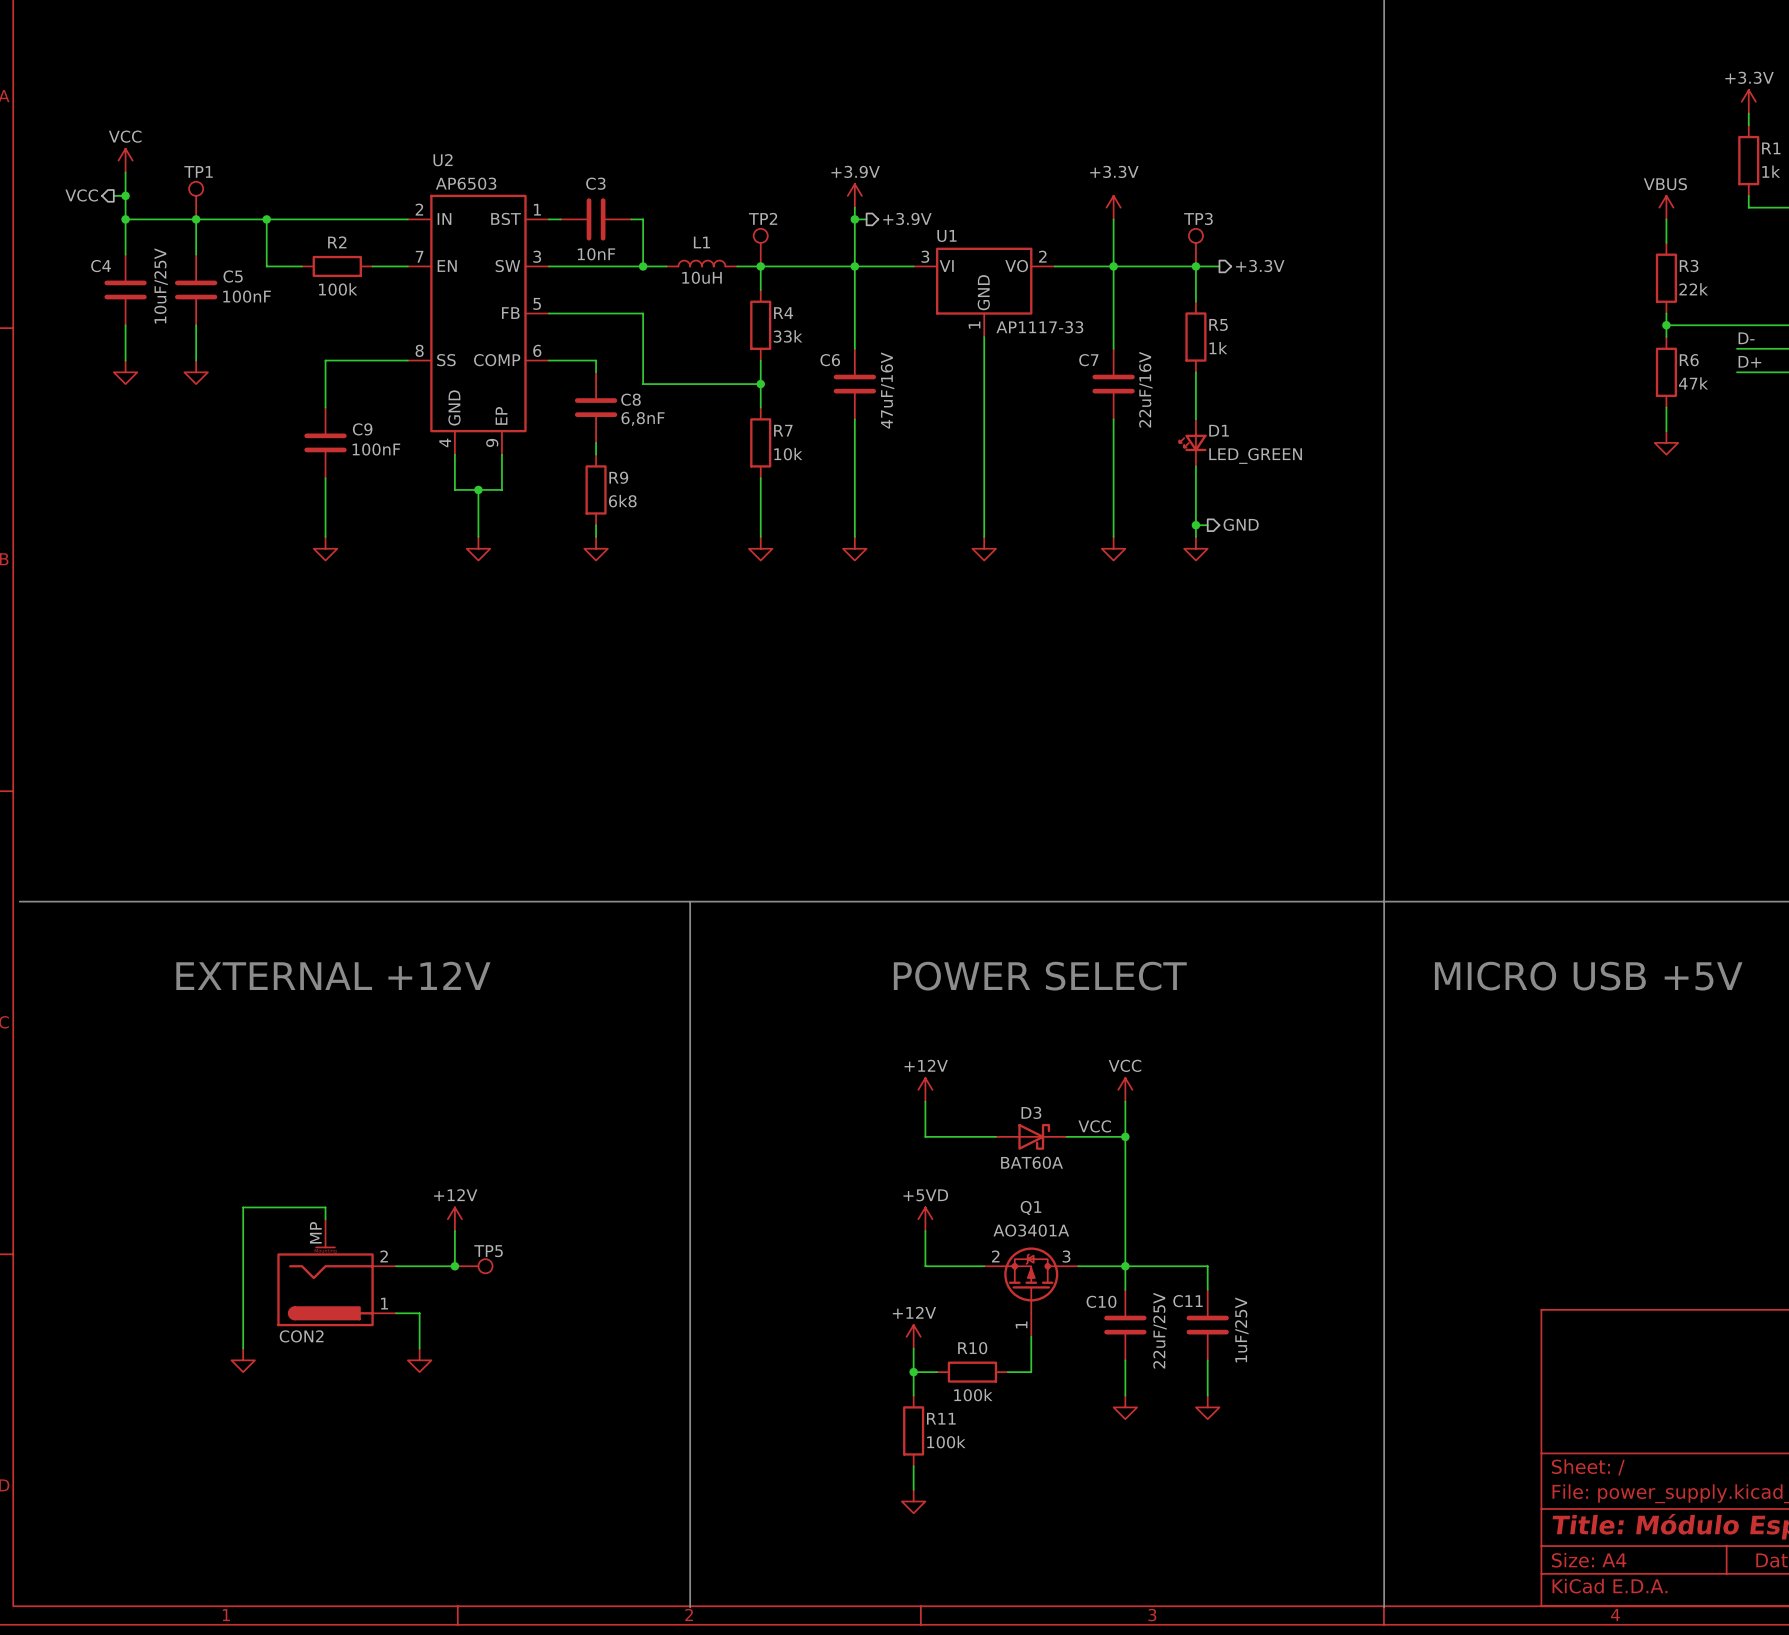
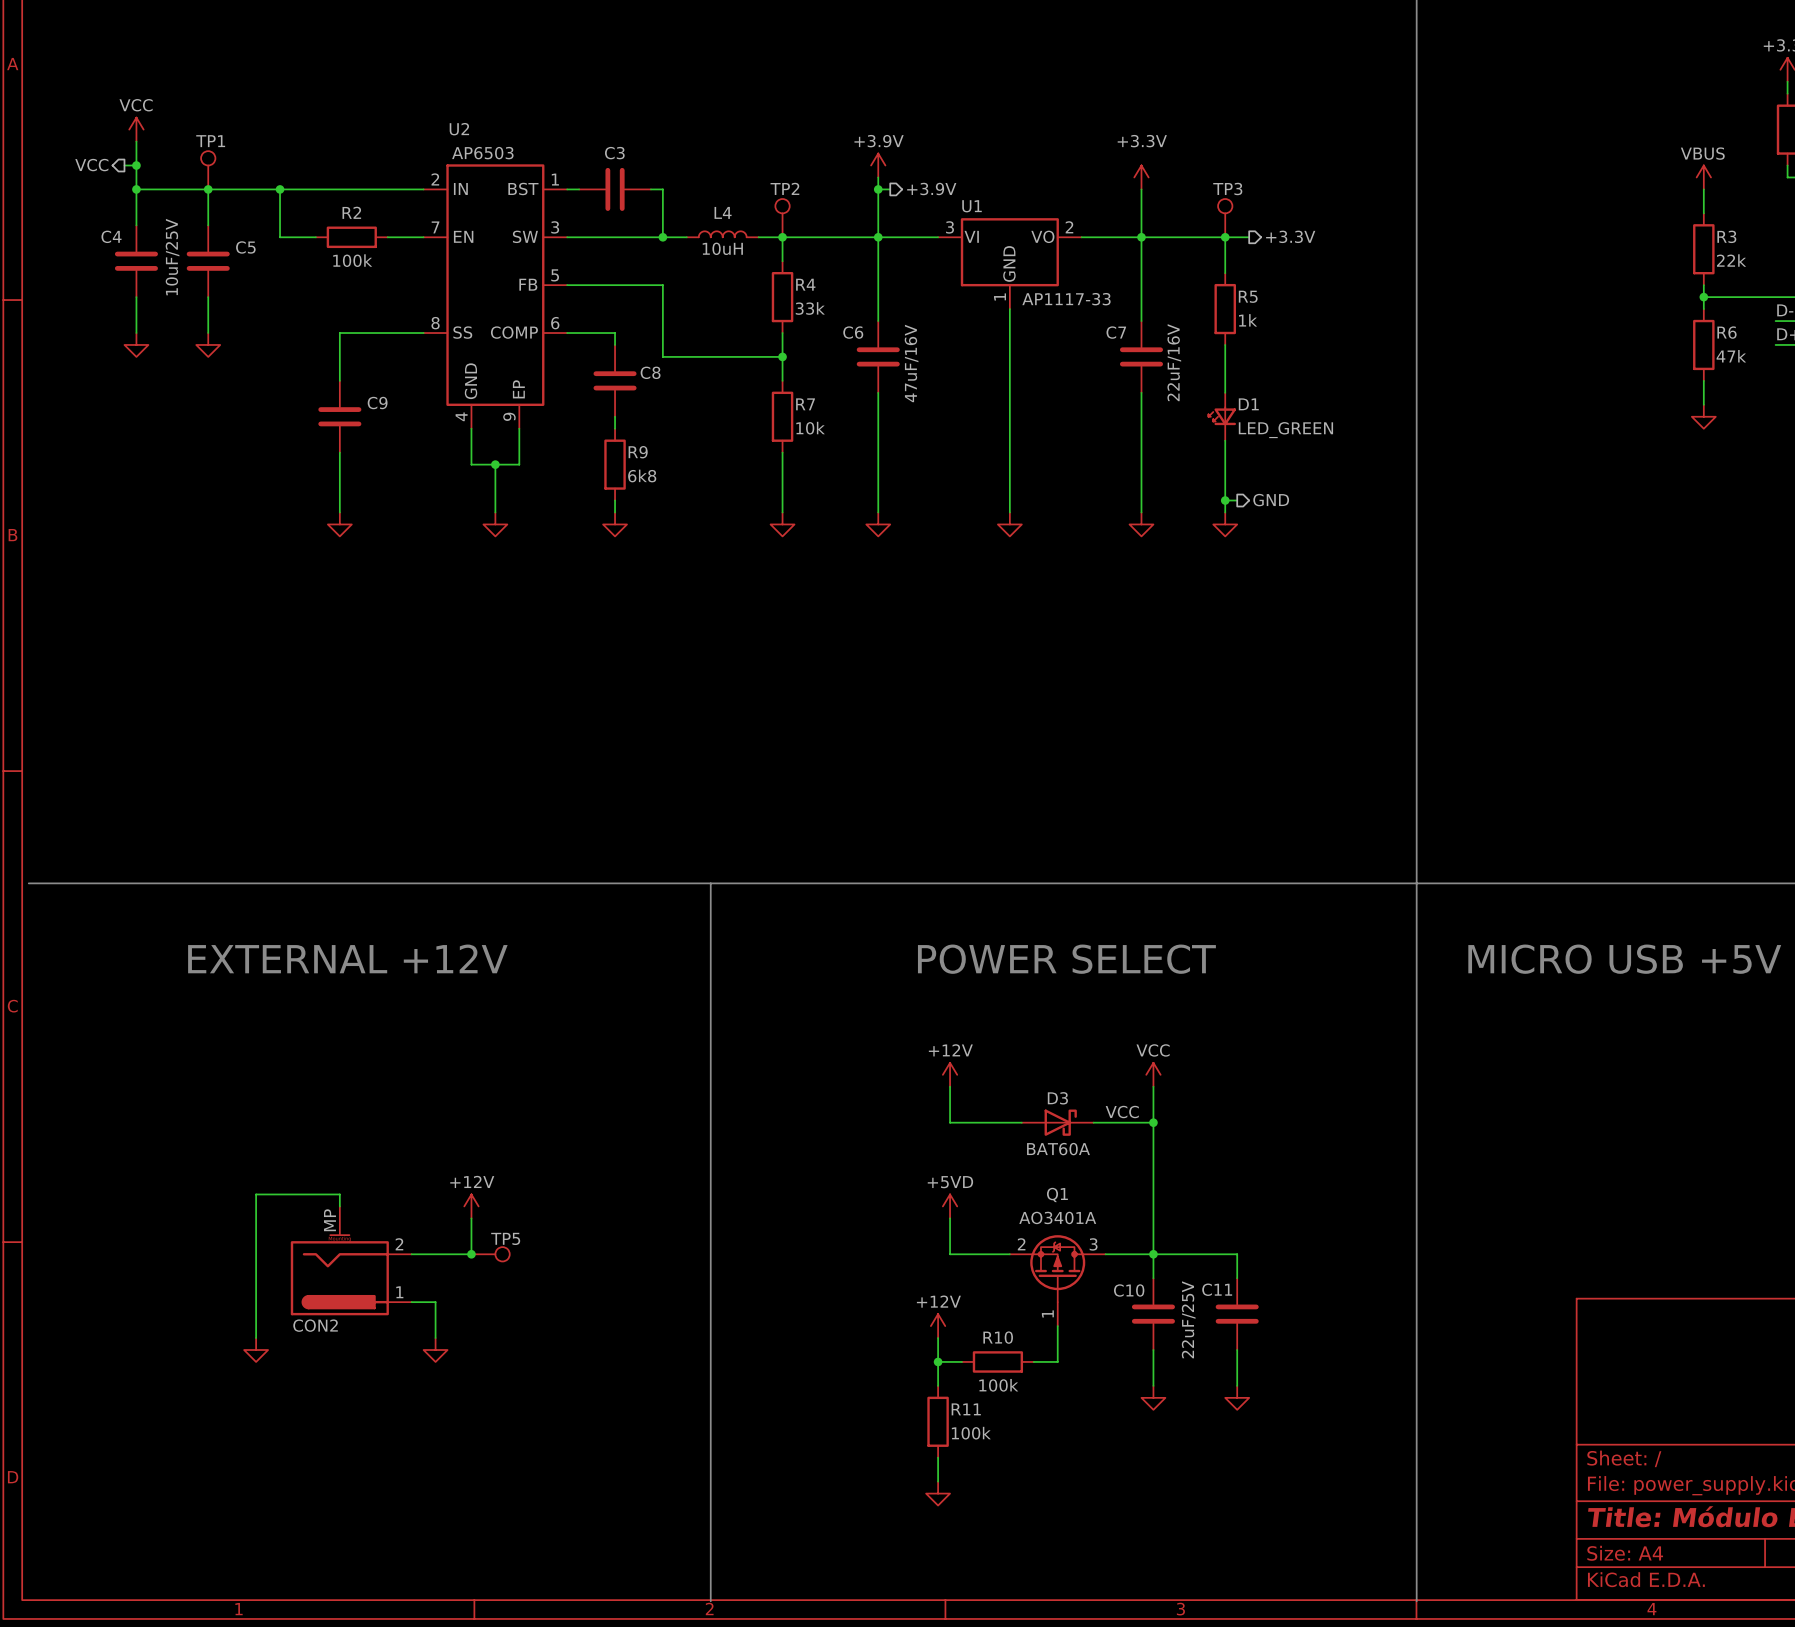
L1 name: L1 (701, 242) -> L4 (723, 212)
C3 value: 10nF (596, 254) -> none
C5 value: 100nF (247, 296) -> none
C8 value: 6,8nF (643, 418) -> none
C9 value: 100nF (376, 449) -> none
C11 value: 1uF/25V (1241, 1329) -> none

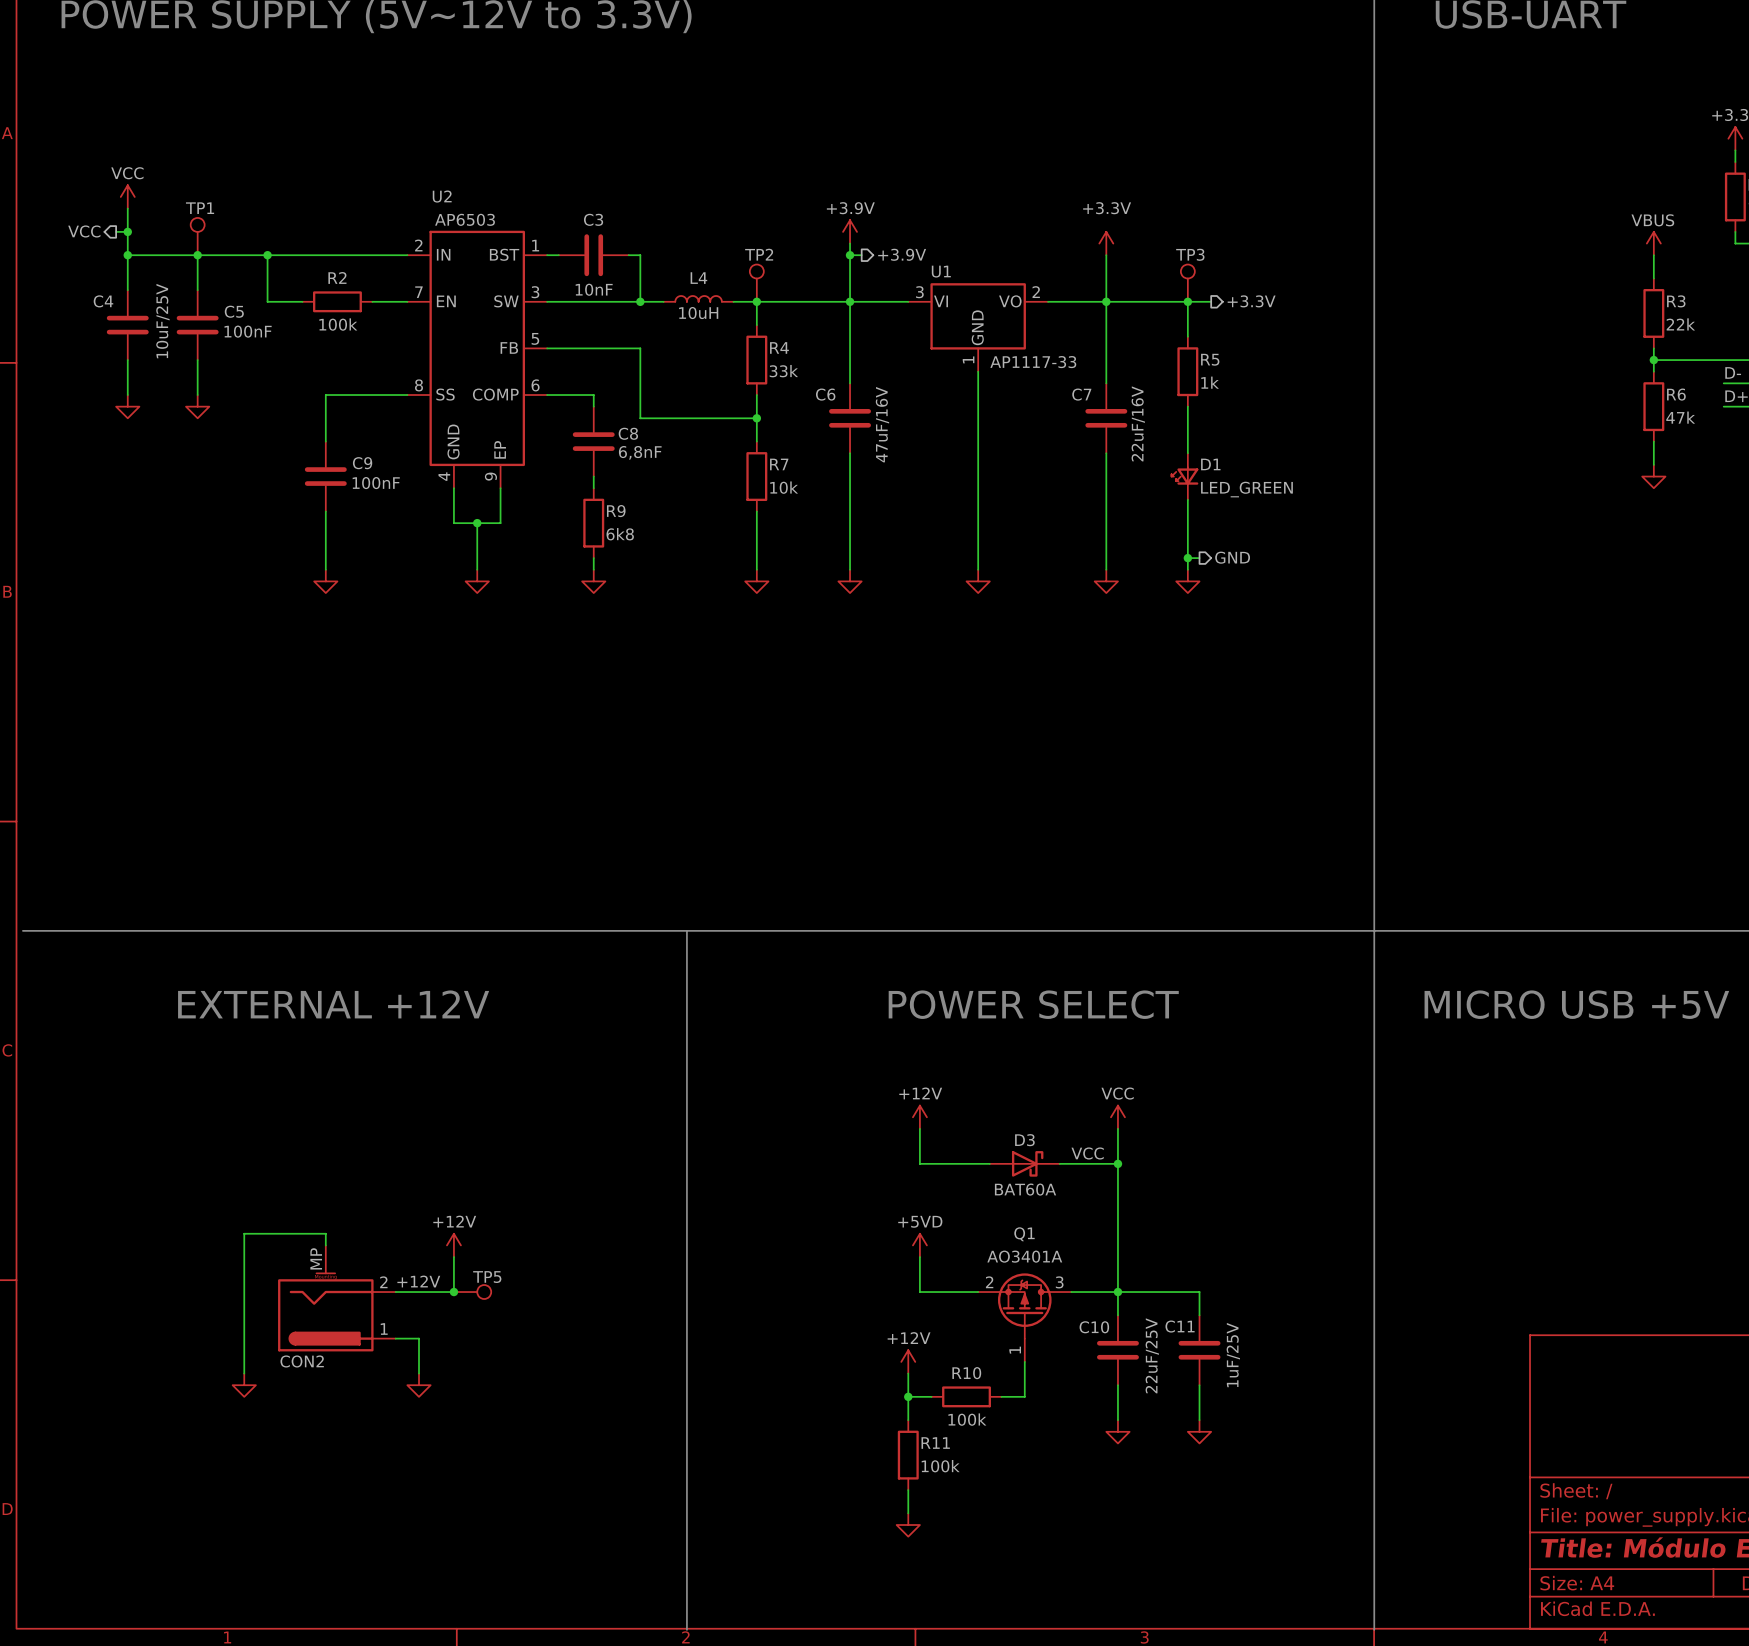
C3 value: none -> 10nF (594, 289)
C5 value: none -> 100nF (248, 331)
C8 value: none -> 6,8nF (640, 452)
C9 value: none -> 100nF (376, 483)
label: none -> +12V (418, 1281)
C11 value: none -> 1uF/25V (1233, 1355)

